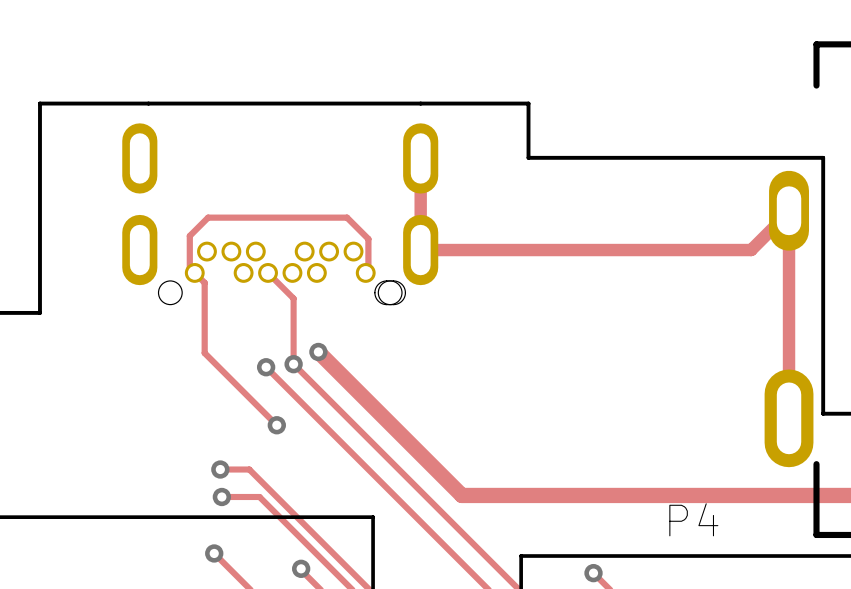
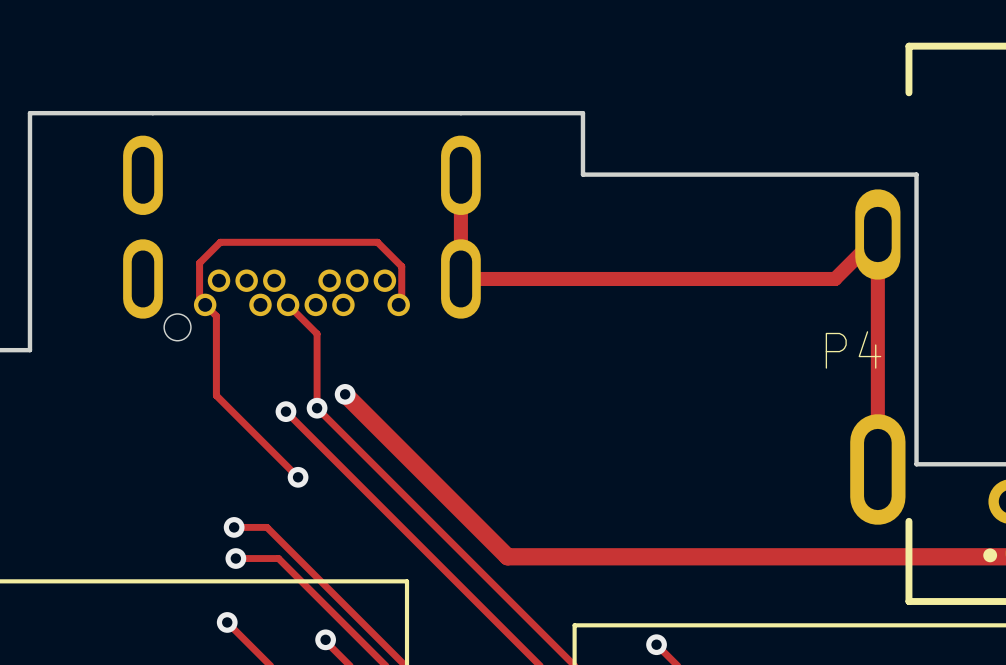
part footprint: [122, 123, 439, 305] -> [123, 135, 481, 341]
P4 name position: P4 (693, 519) -> P4 (853, 349)

